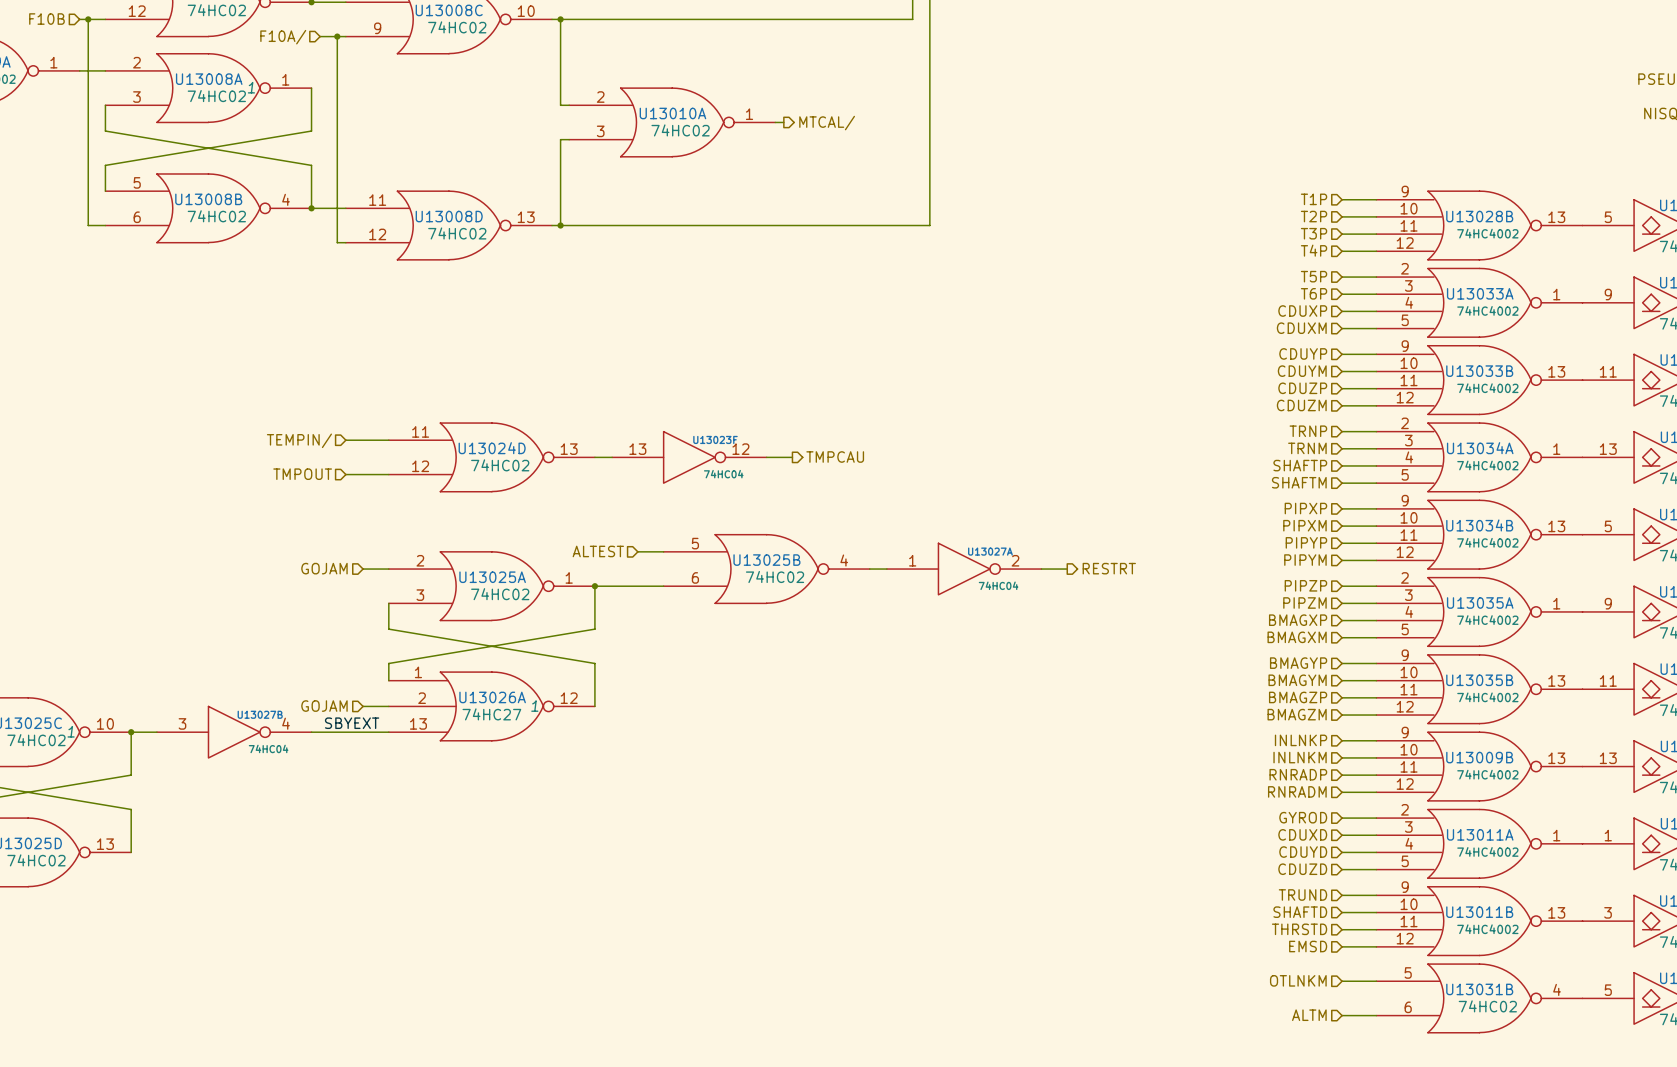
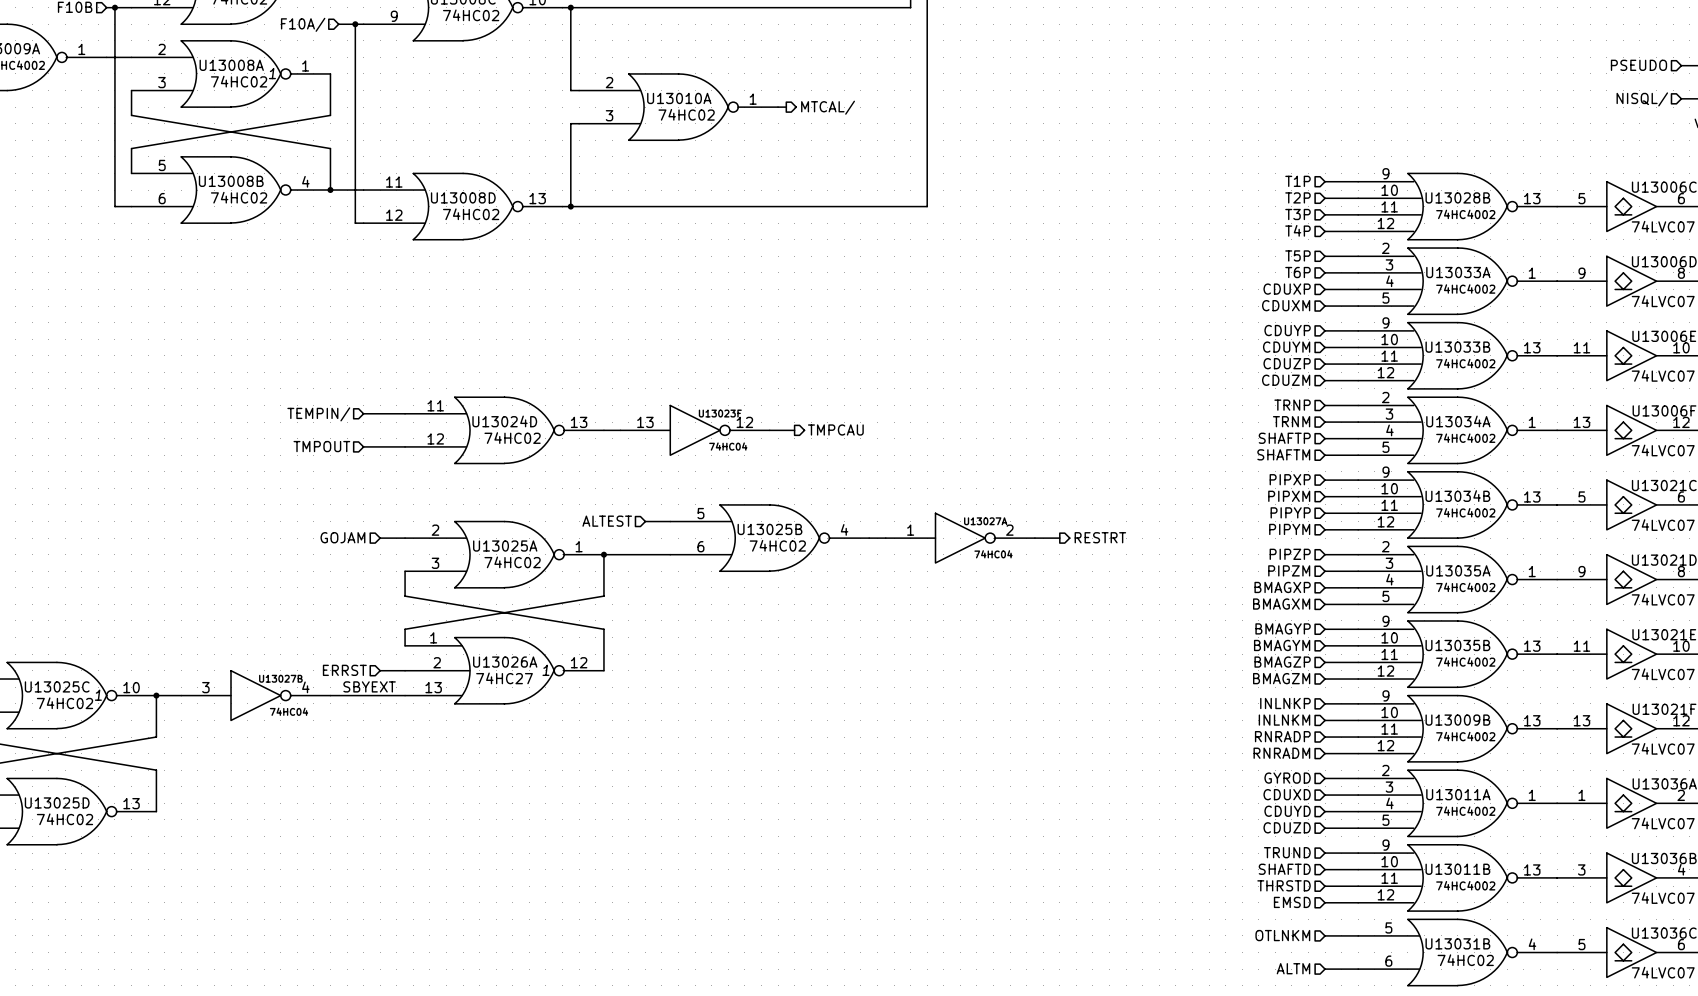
hierarchical label: GOJAM (324, 706) -> ERRST (344, 670)

